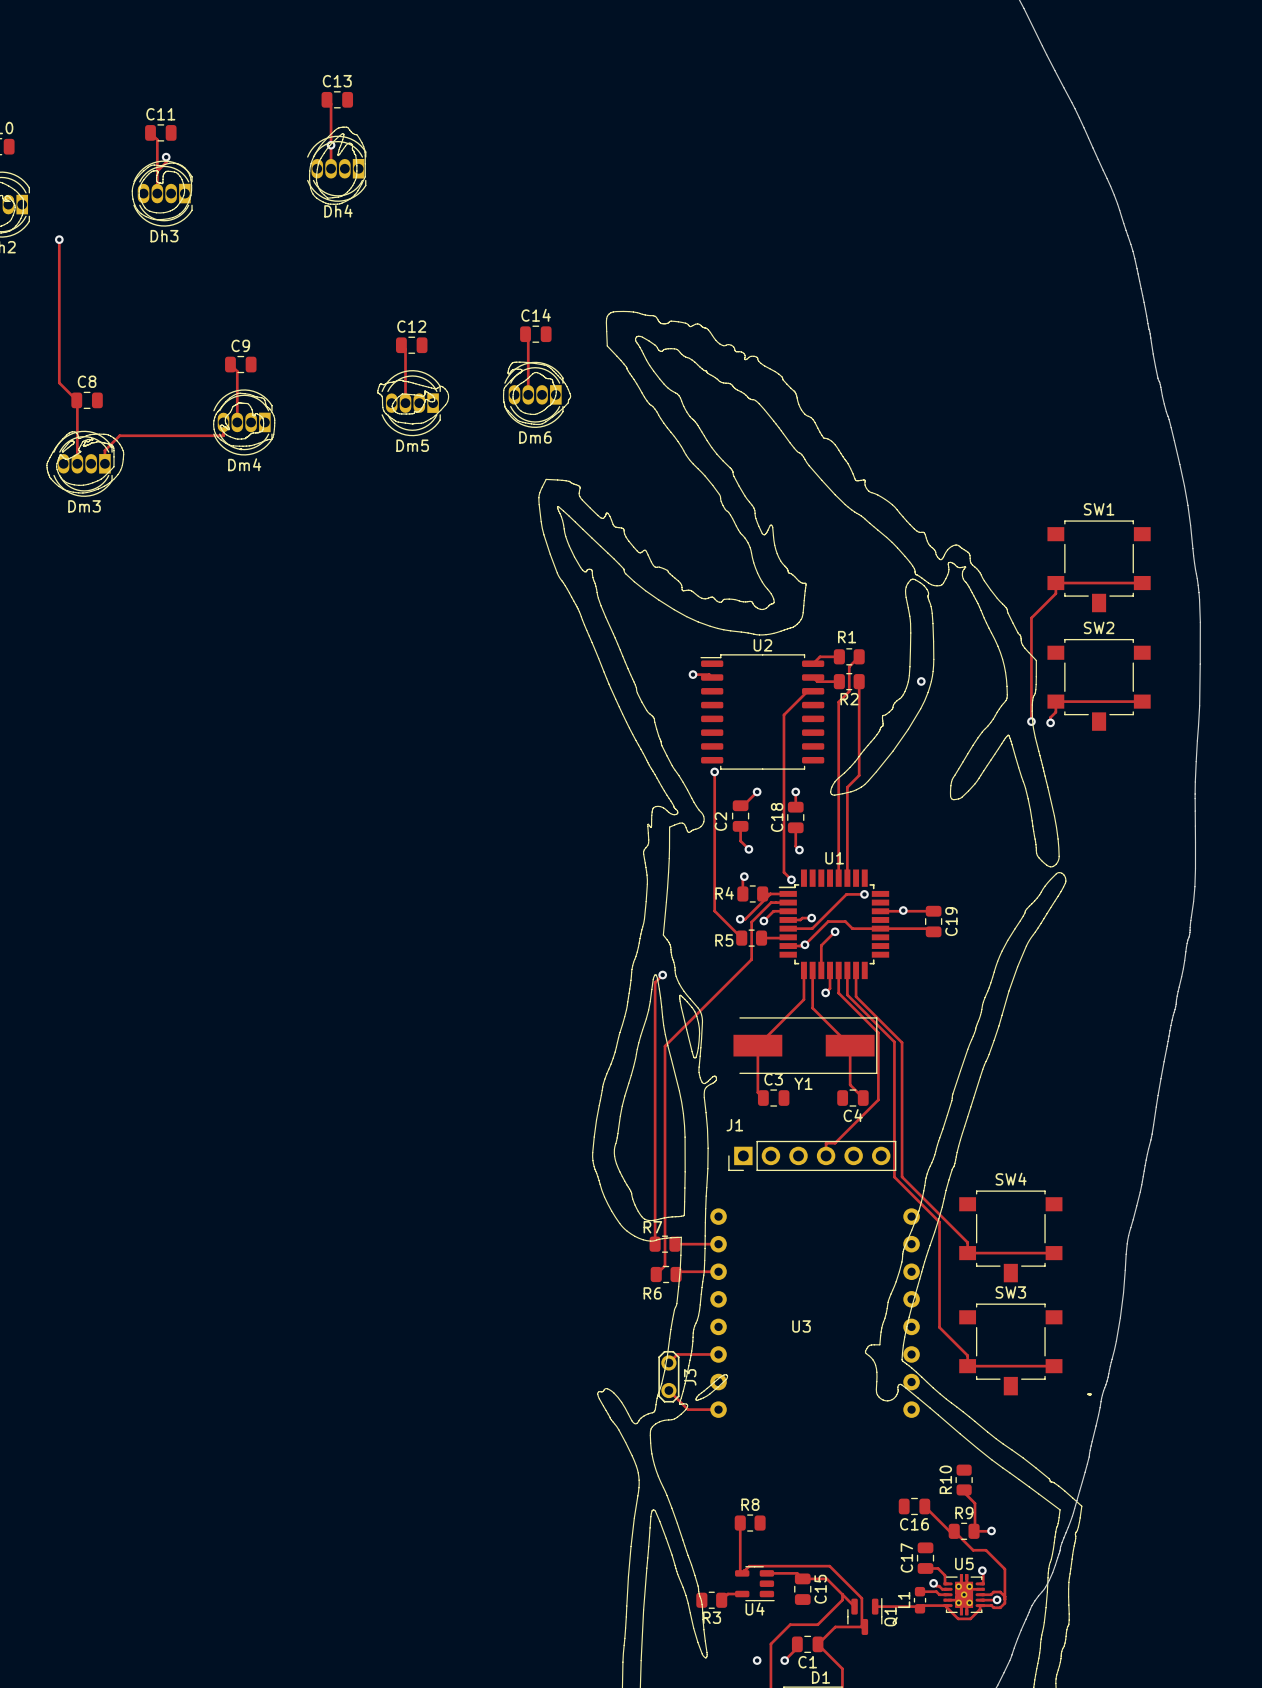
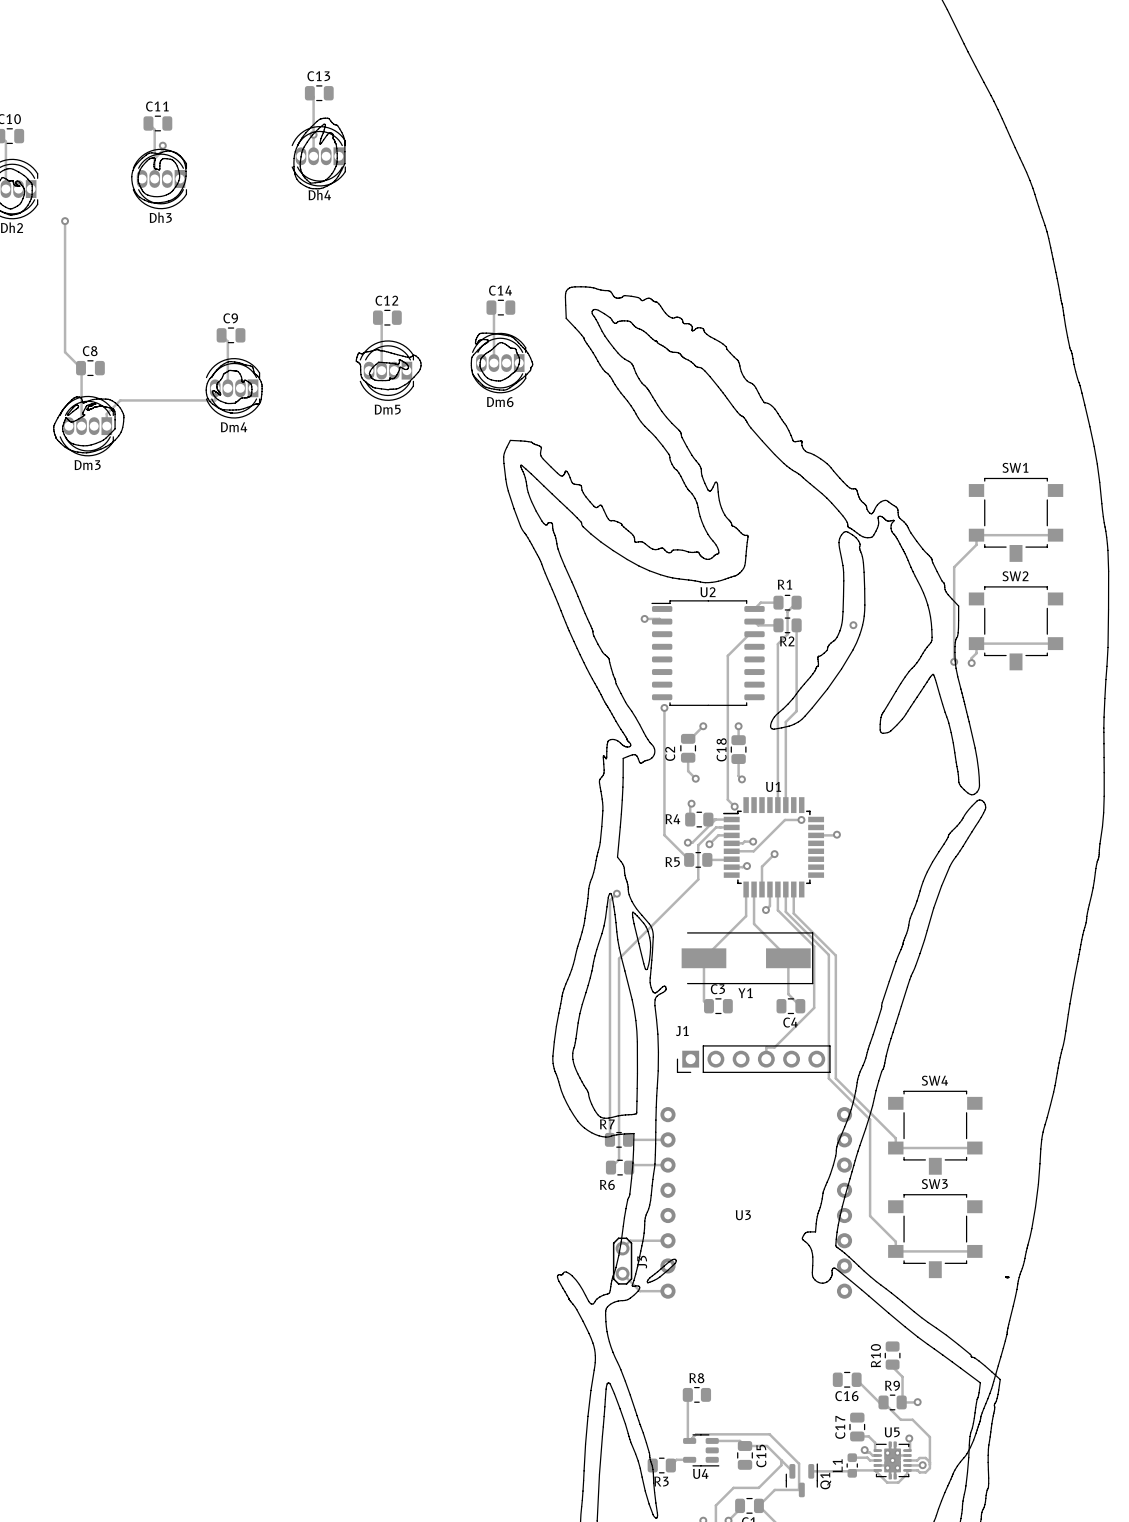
track: (903, 910) (933, 911) -> none
C19: (933, 921) -> none
track: (933, 931) (930, 928) (852, 928) (845, 921) (828, 921) (804, 944) -> none

